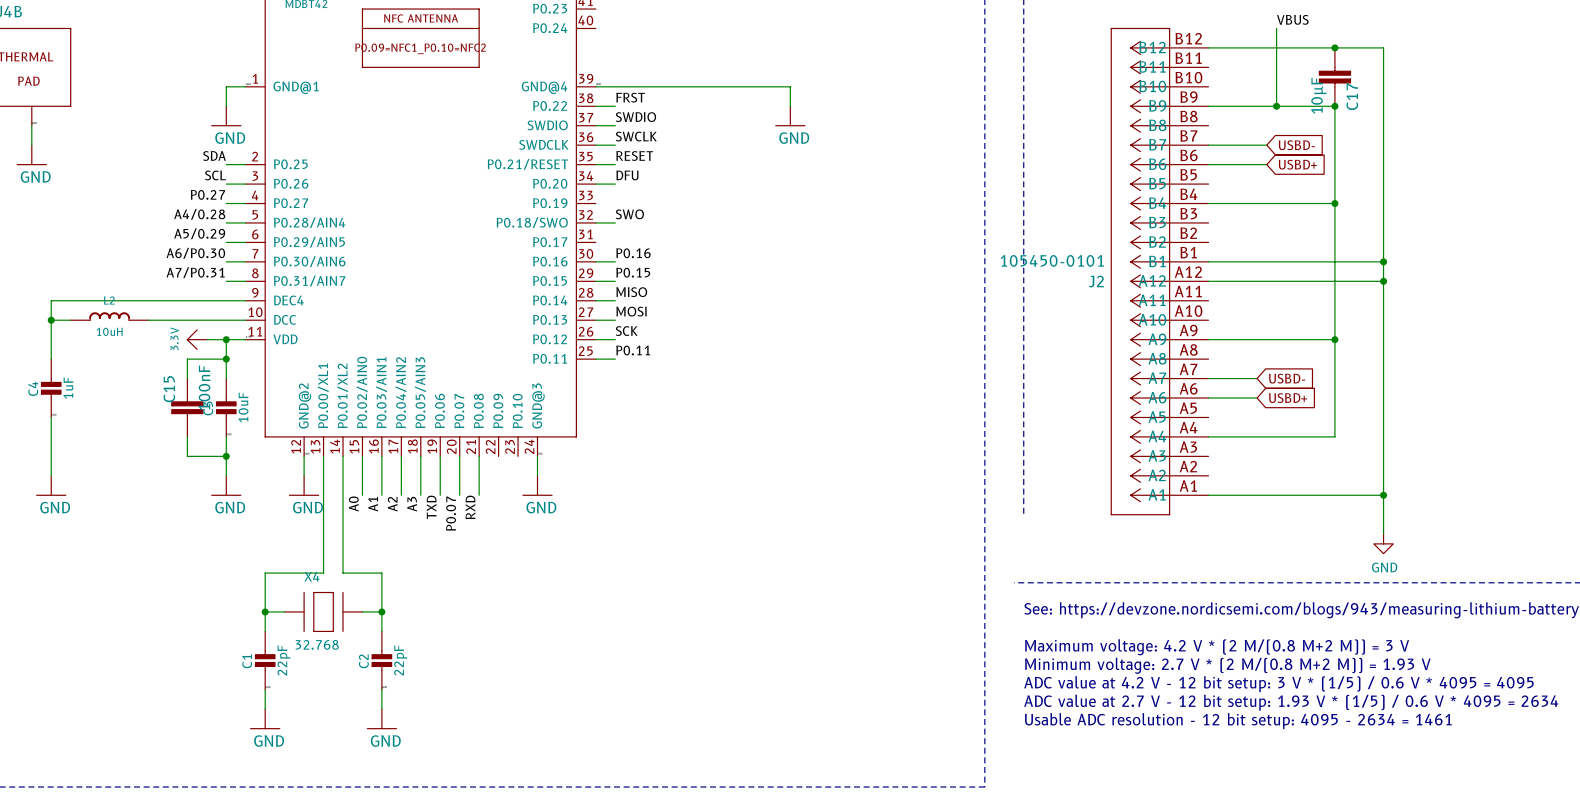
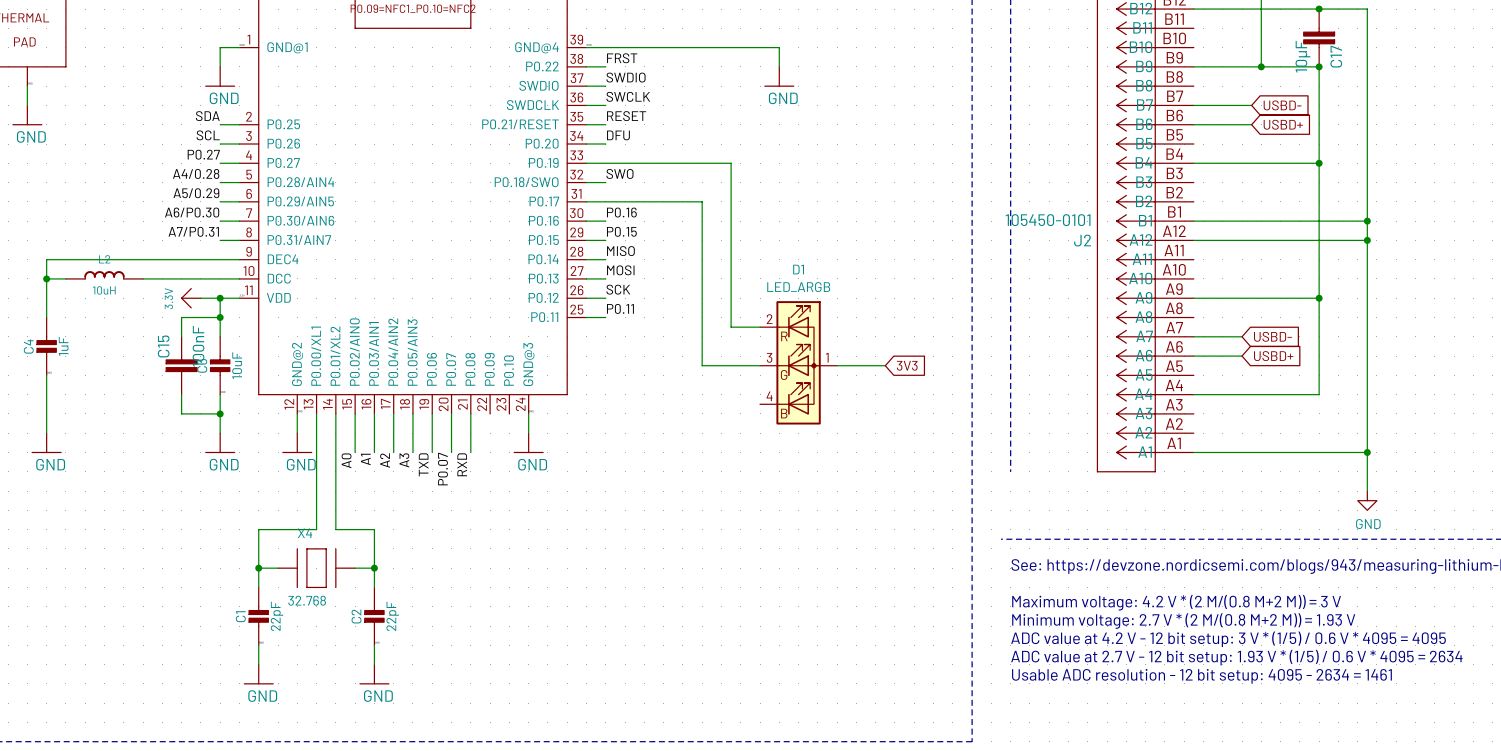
wire: none -> (586, 163) (731, 163) (731, 327) (760, 327)
wire: none -> (586, 201) (702, 201) (702, 365) (760, 365)
D1: none -> LED_ARGB (798, 362)
wire: none -> (837, 365) (885, 365)
global label: none -> 3V3 (907, 365)

